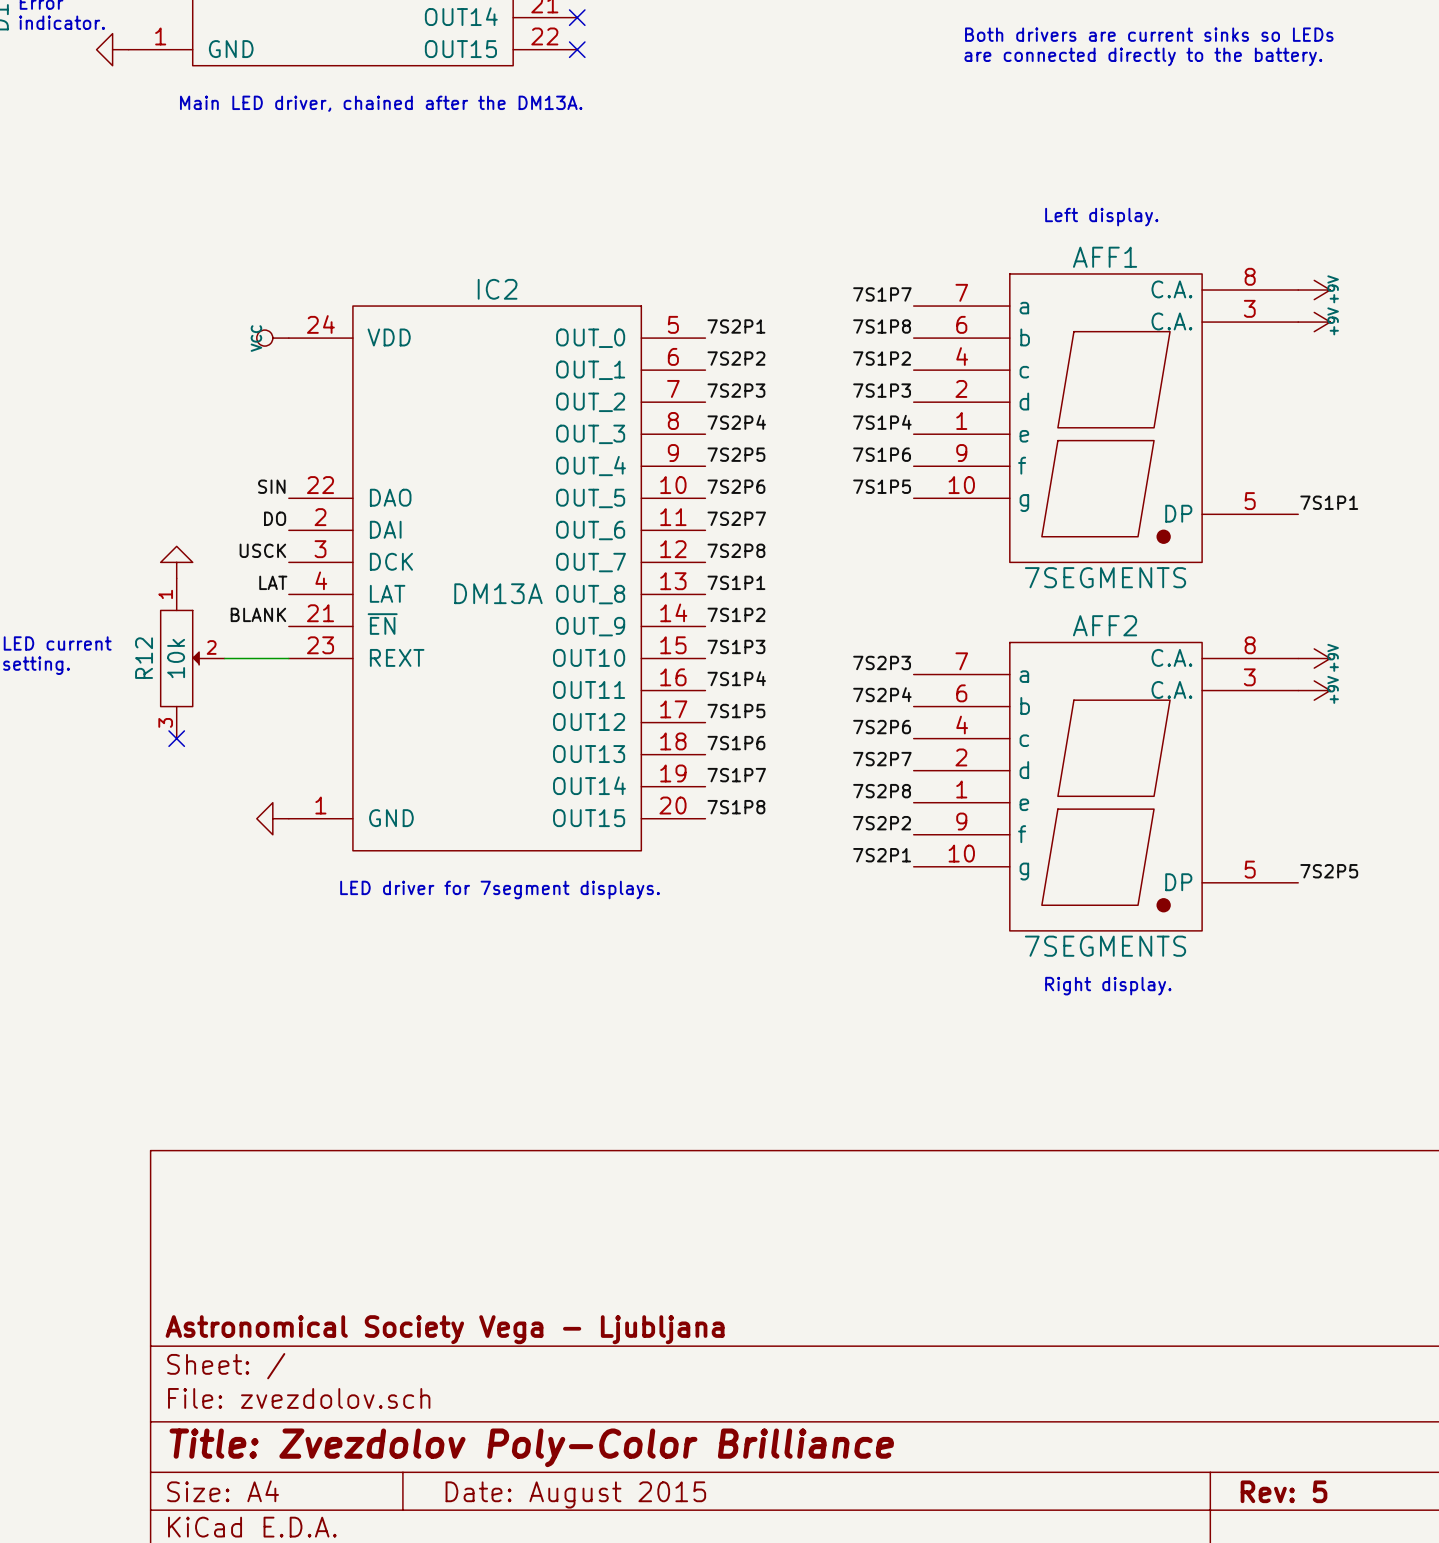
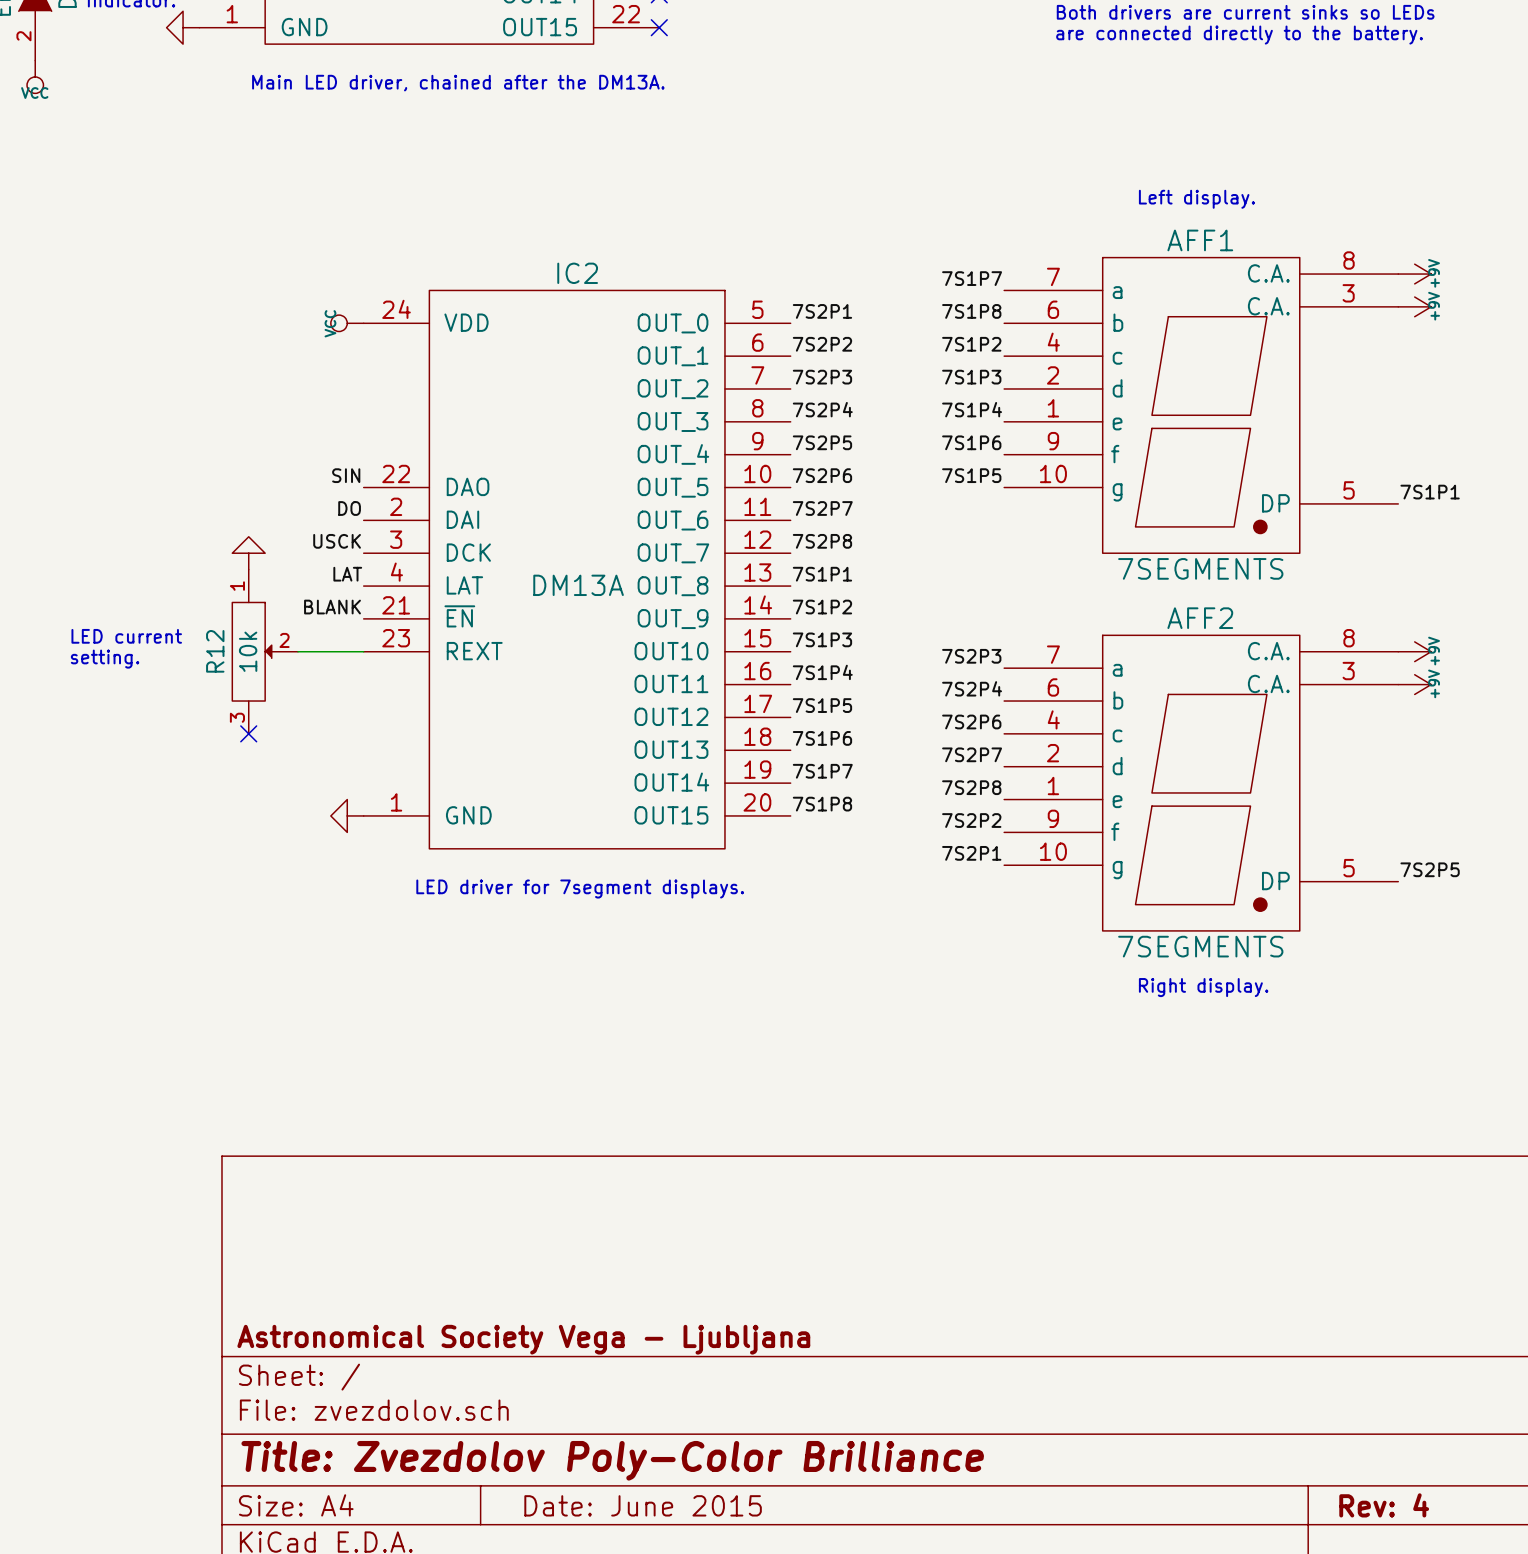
title block: Rev: 5 (1284, 1491) -> Rev: 4 (1384, 1505)
title block: Date: August 2015 (575, 1494) -> Date: June 2015 (643, 1505)

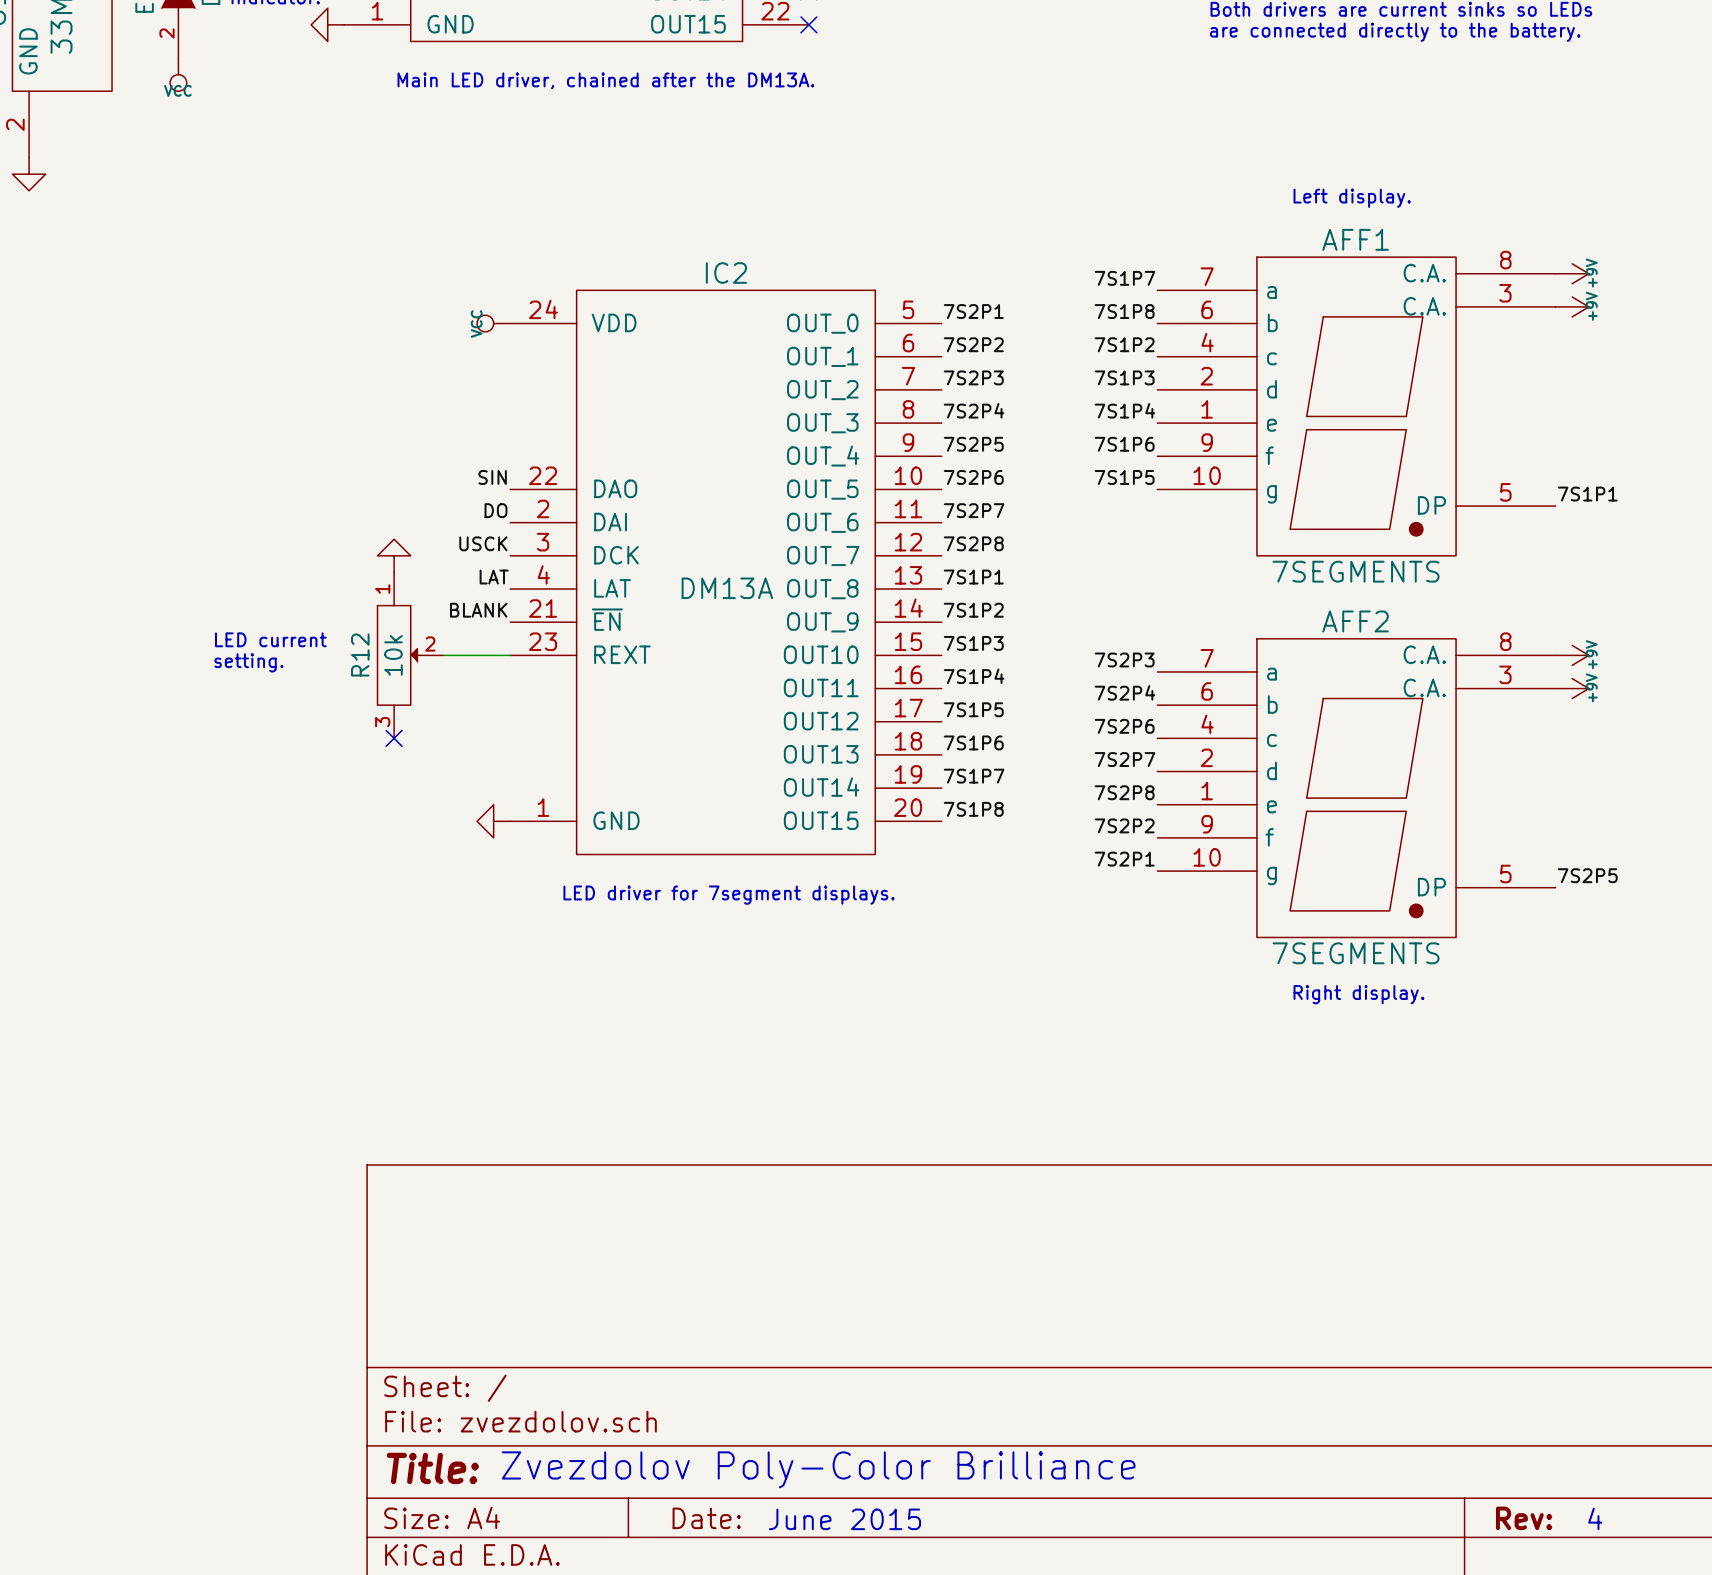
title block: Astronomical Society Vega - Ljubljana (523, 1339) -> none
text: none -> Zvezdolov Poly-Color Brilliance (818, 1469)
title block: Title: Zvezdolov Poly-Color Brilliance (612, 1460) -> Title: (432, 1468)
title block: Date: June 2015 (643, 1505) -> Date: (706, 1518)
title block: Rev: 4 (1384, 1505) -> Rev: (1524, 1518)
text: none -> June 2015 (844, 1519)
text: none -> 4 (1595, 1518)

